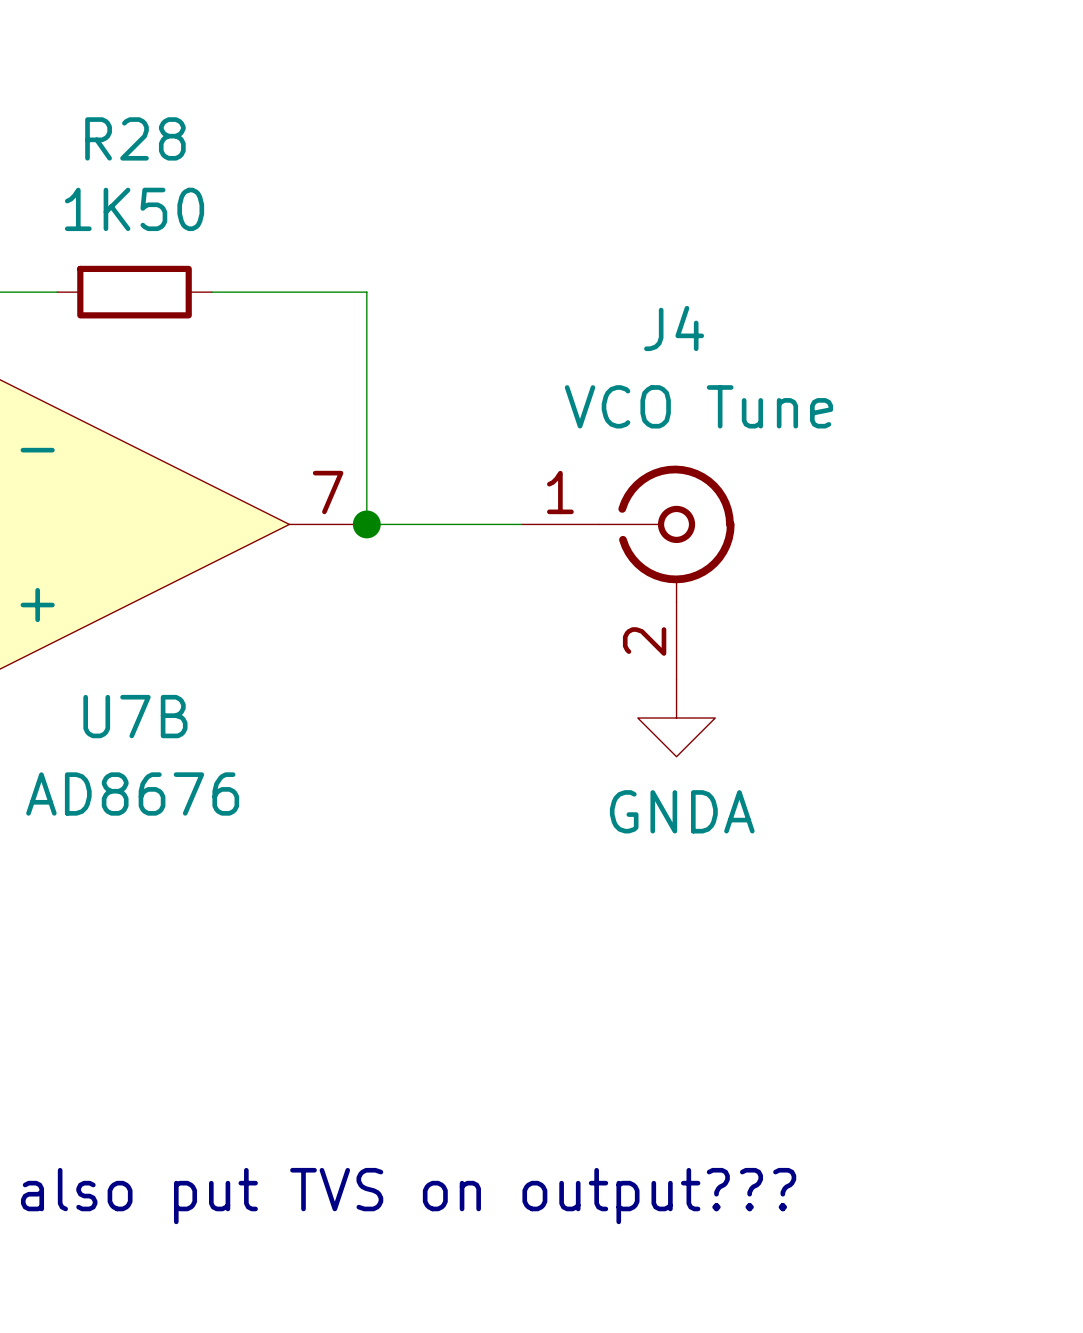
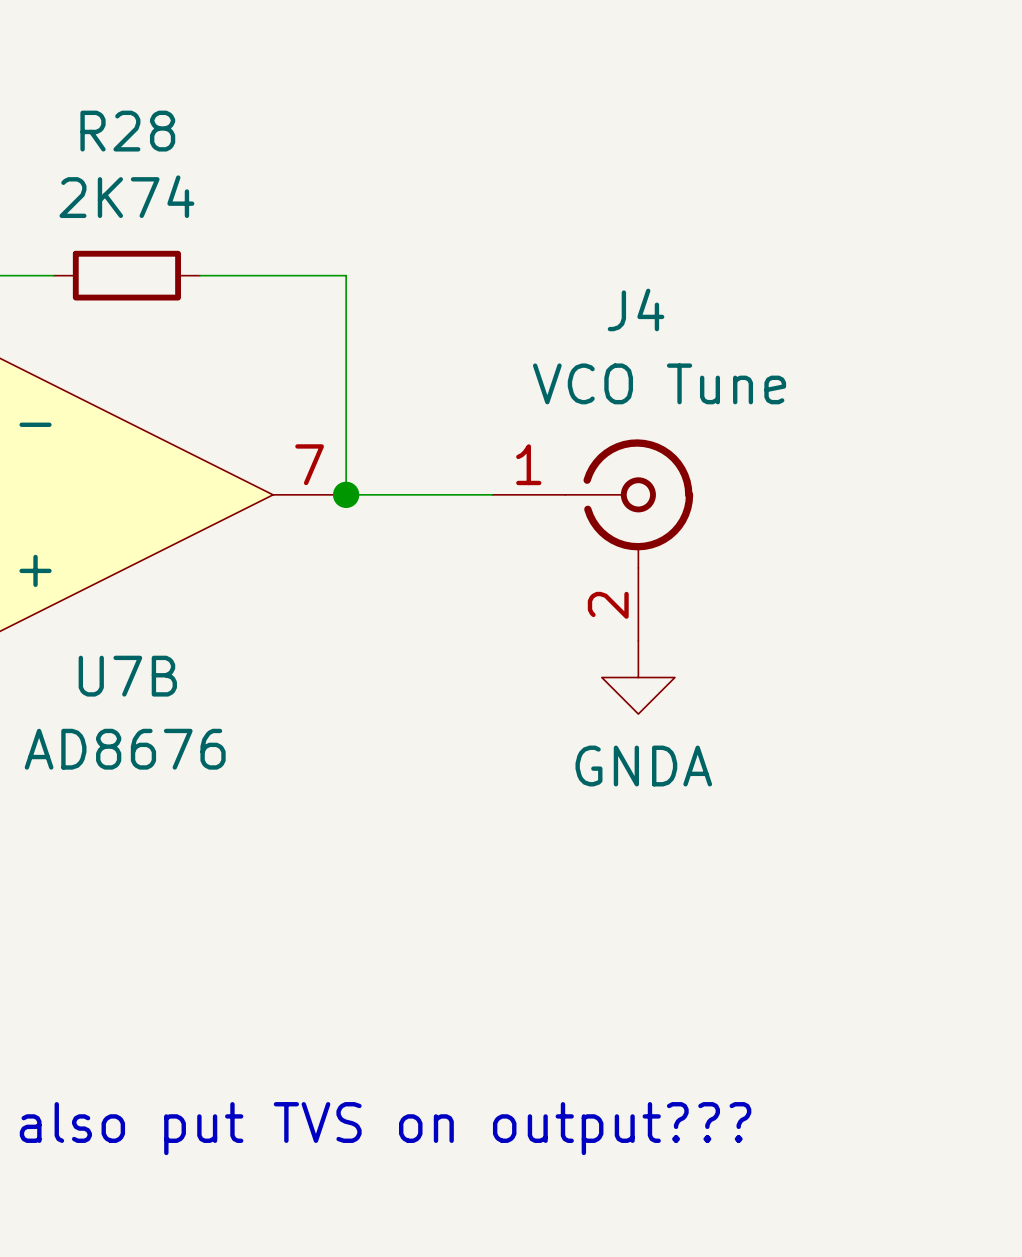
R28 value: 1K50 (134, 209) -> 2K74 (126, 196)

